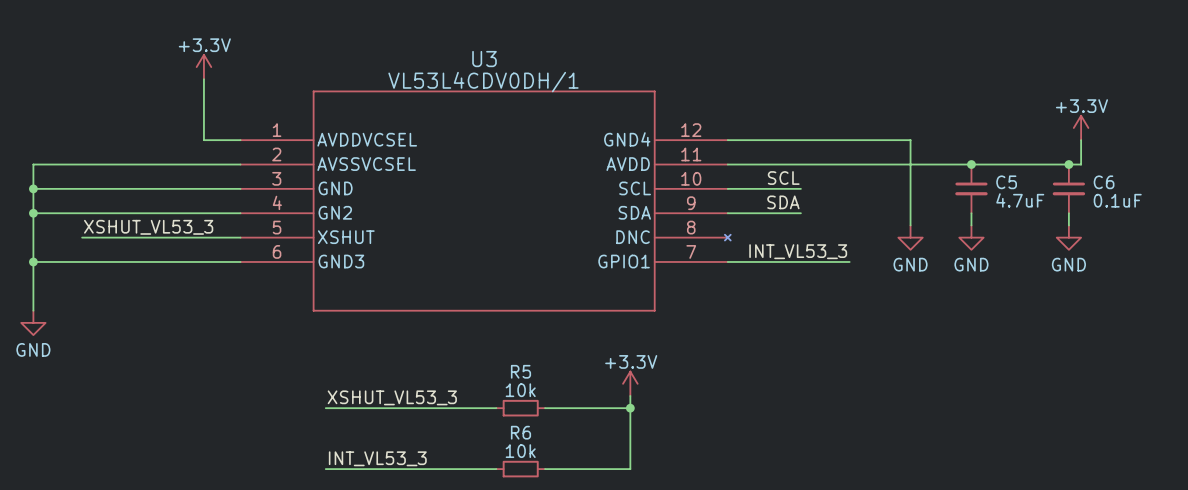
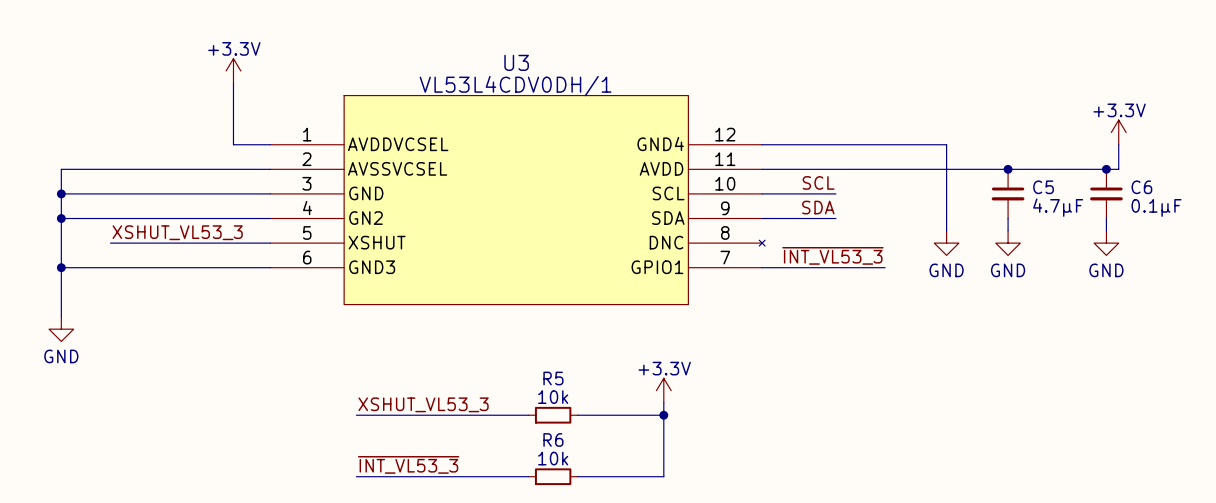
U3 symbol: [240, 90, 731, 312] -> [270, 95, 766, 305]
C5 value: 4.7uF (1020, 200) -> 4.7µF (1058, 207)
C6 value: 0.1uF (1117, 200) -> 0.1µF (1156, 207)
label: INT_VL53_3 (798, 251) -> ~{INT_VL53_3} (832, 255)
label: INT_VL53_3 (377, 458) -> ~{INT_VL53_3} (408, 464)

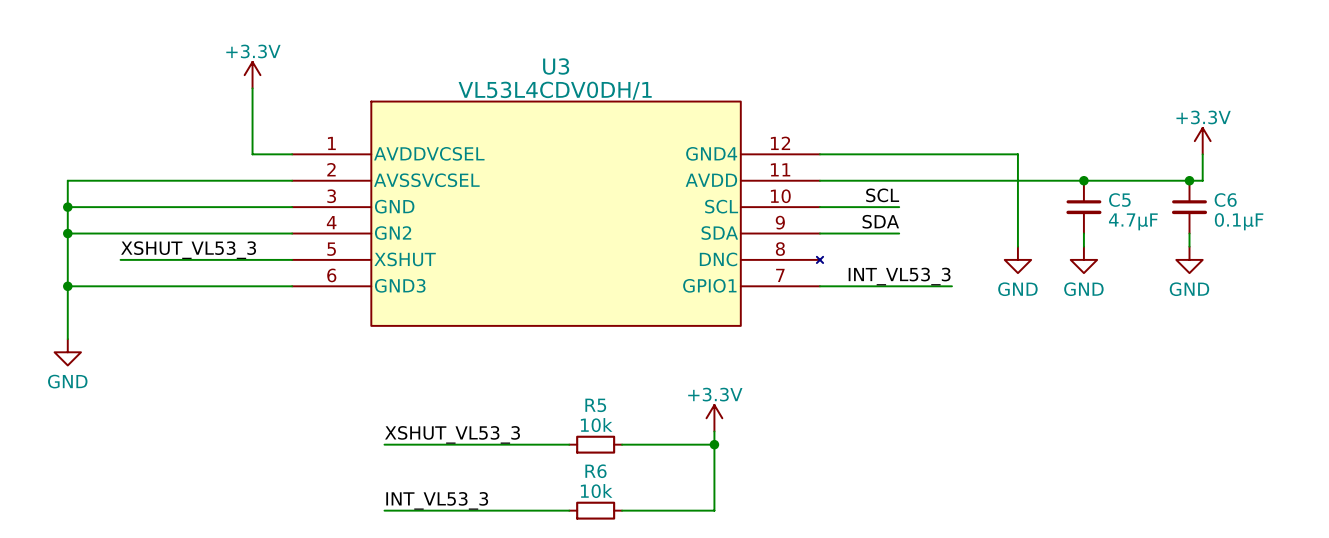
label: ~{INT_VL53_3} (832, 255) -> INT_VL53_3 (899, 276)
label: ~{INT_VL53_3} (408, 464) -> INT_VL53_3 (437, 500)

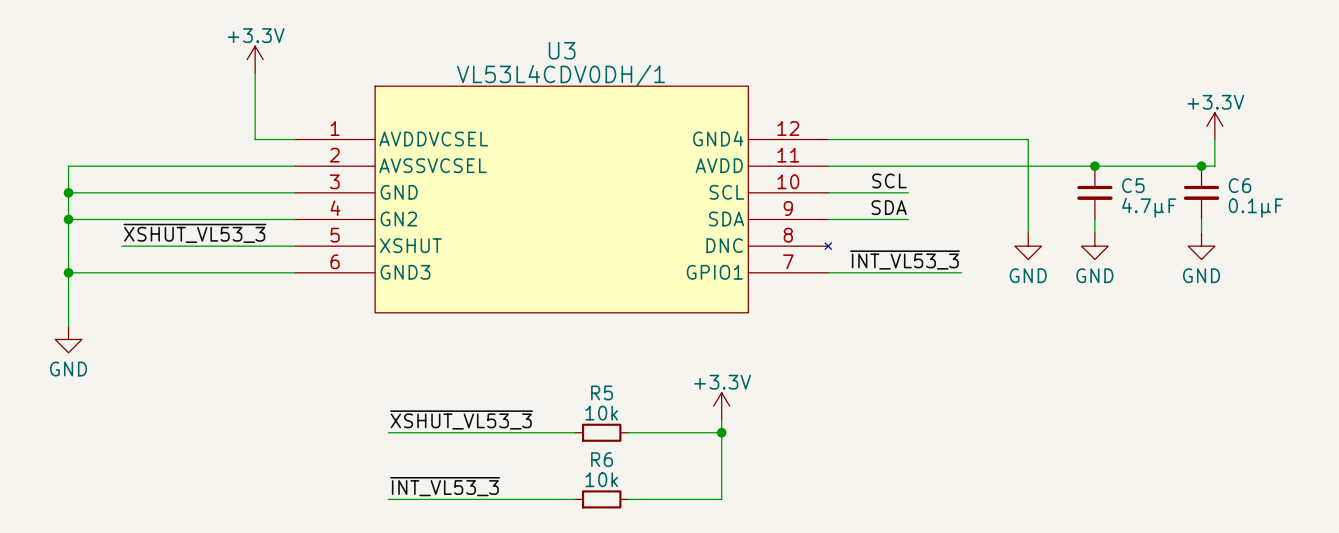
label: XSHUT_VL53_3 (188, 250) -> ~{XSHUT_VL53_3} (194, 233)
label: INT_VL53_3 (899, 276) -> ~{INT_VL53_3} (905, 260)
label: XSHUT_VL53_3 (452, 434) -> ~{XSHUT_VL53_3} (461, 419)
label: INT_VL53_3 (437, 500) -> ~{INT_VL53_3} (445, 486)

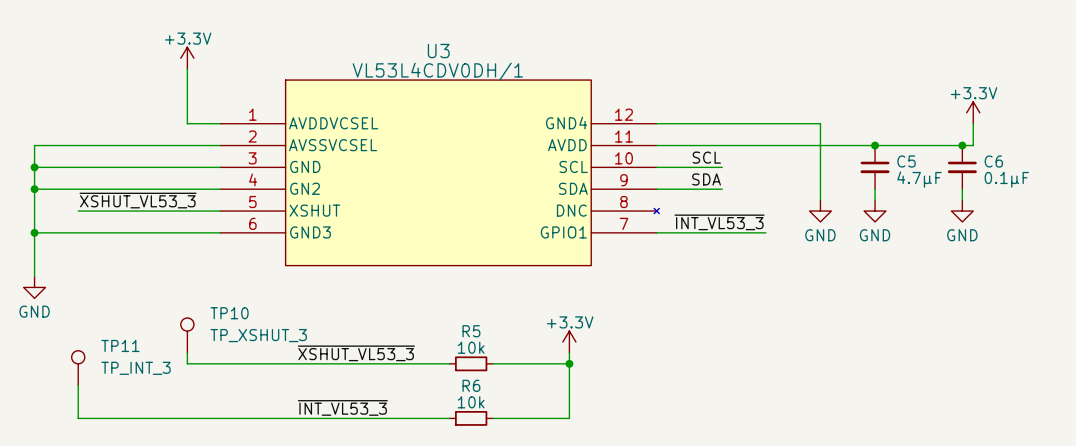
TP10: none -> TP_XSHUT_3 (187, 335)
wire: none -> (187, 352) (187, 363) (296, 363)
TP11: none -> TP_INT_3 (78, 368)
wire: none -> (78, 385) (78, 418) (296, 418)

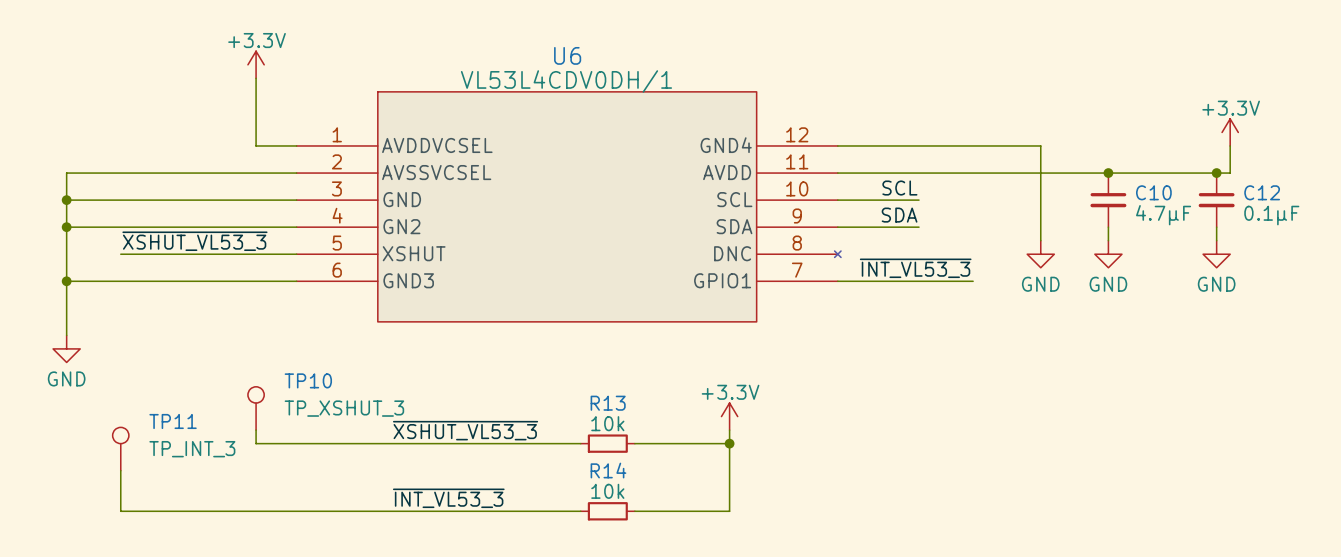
U3 name: U3 (438, 51) -> U6 (567, 55)
C5 name: C5 (906, 161) -> C10 (1153, 192)
C6 name: C6 (993, 161) -> C12 (1262, 192)
R5 name: R5 (471, 331) -> R13 (608, 403)
R6 name: R6 (471, 385) -> R14 (608, 470)

